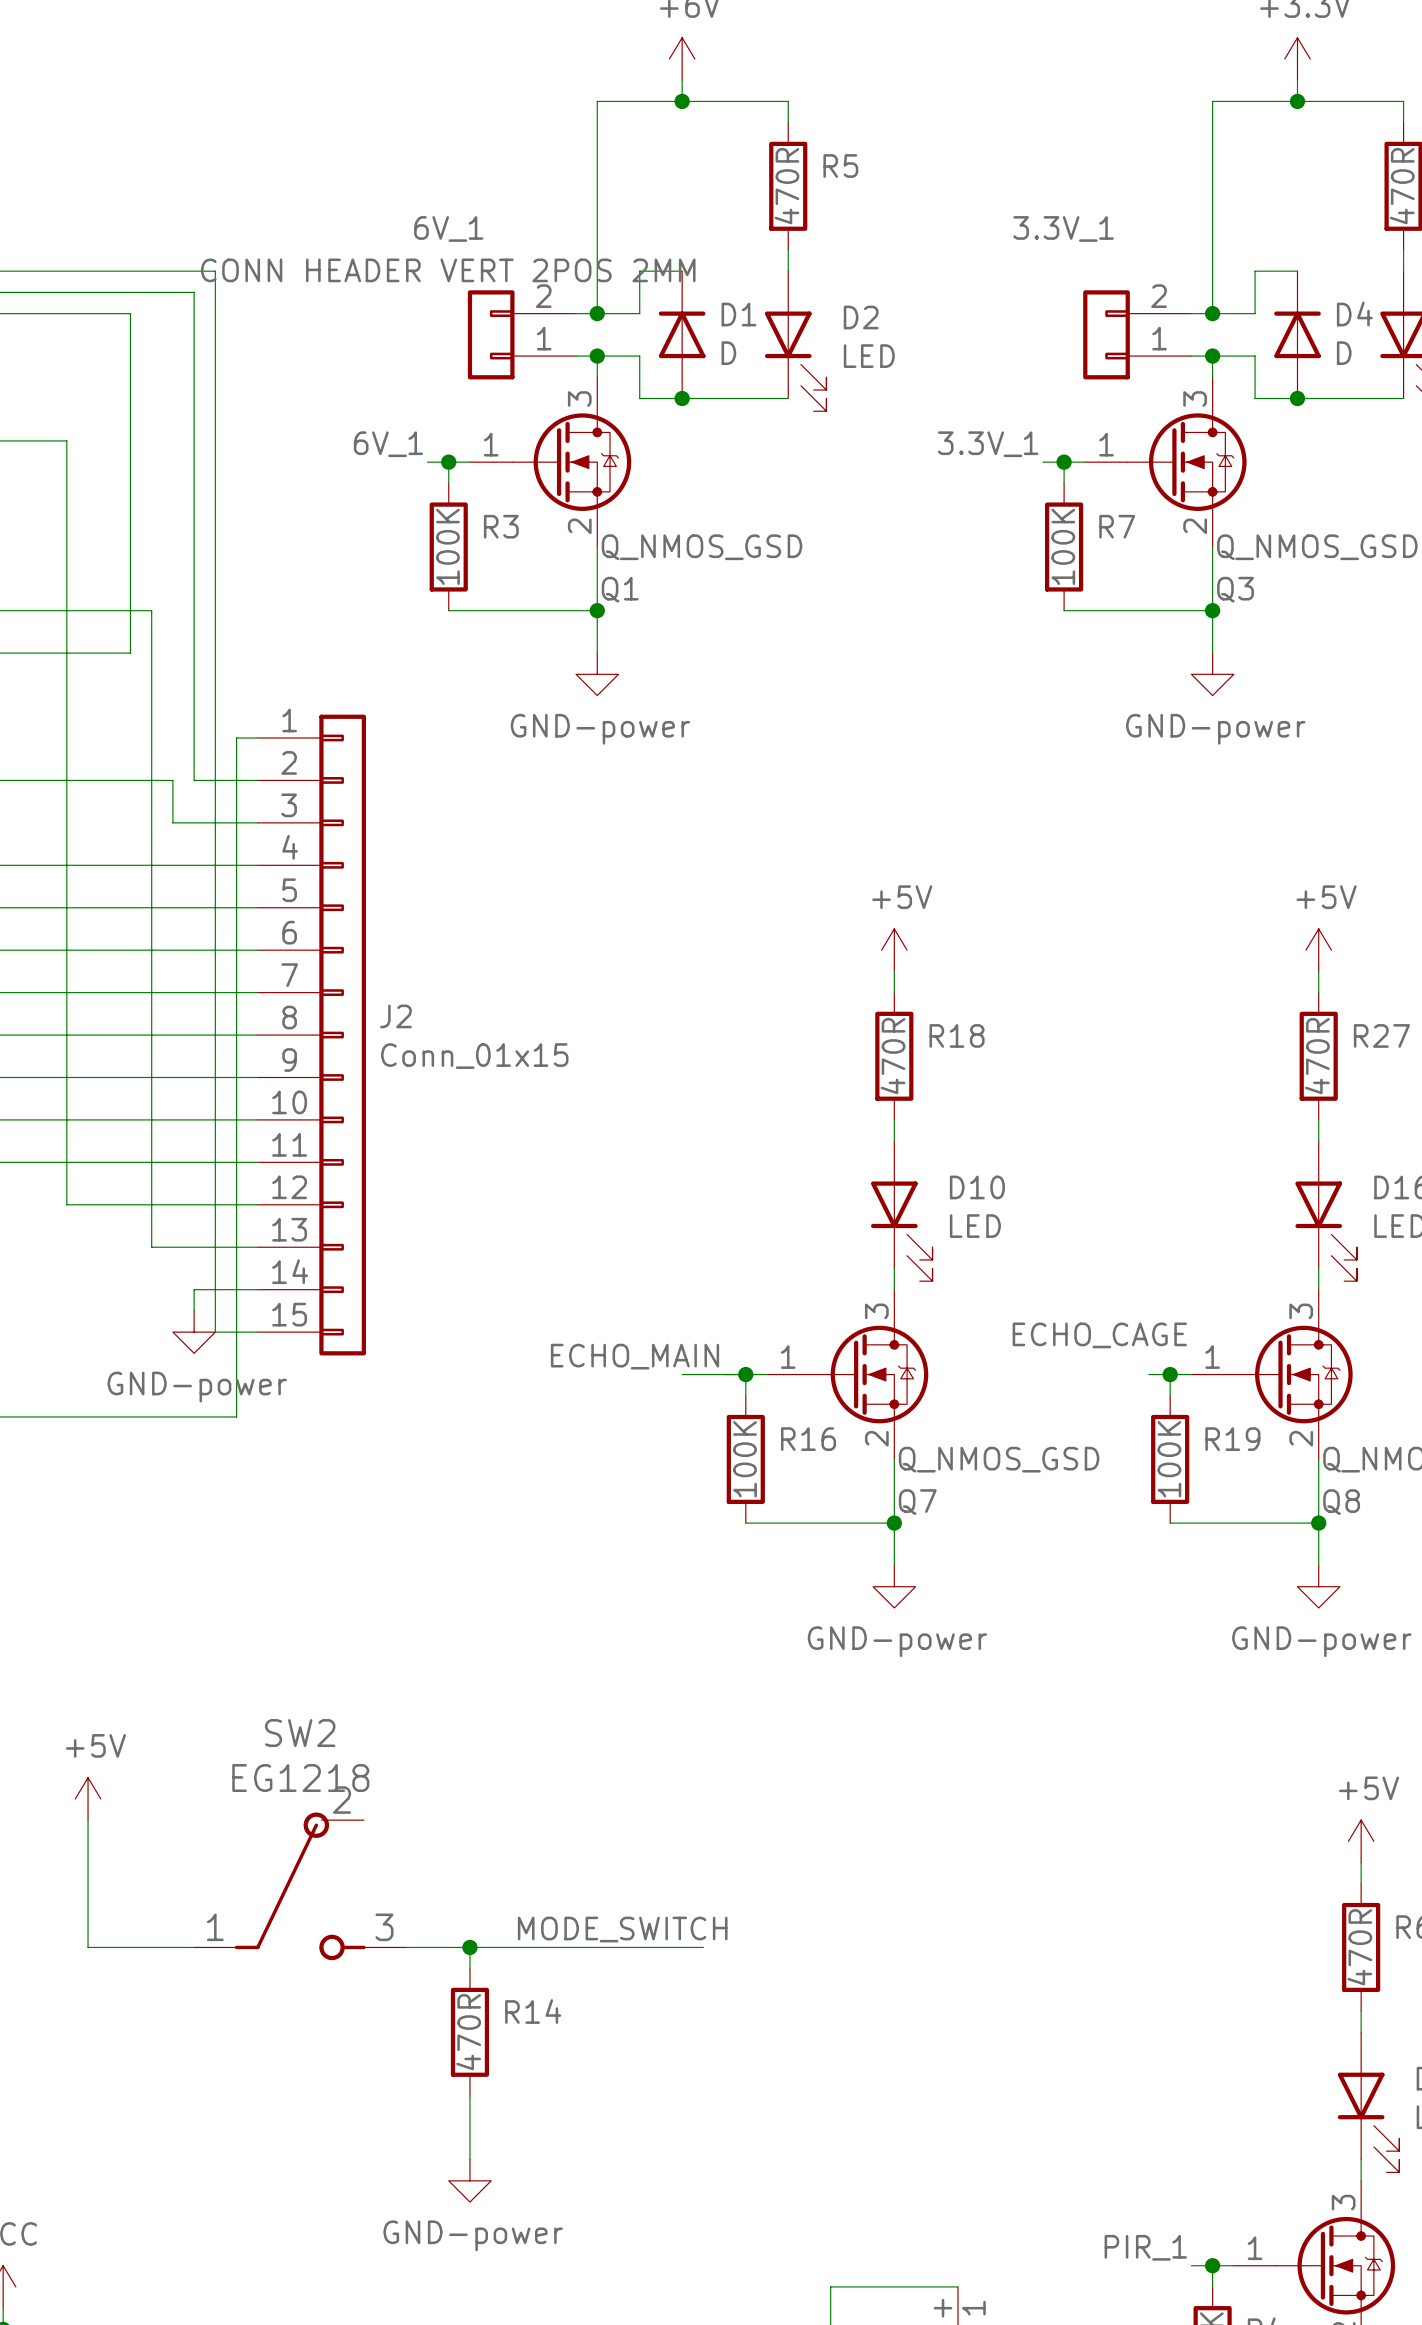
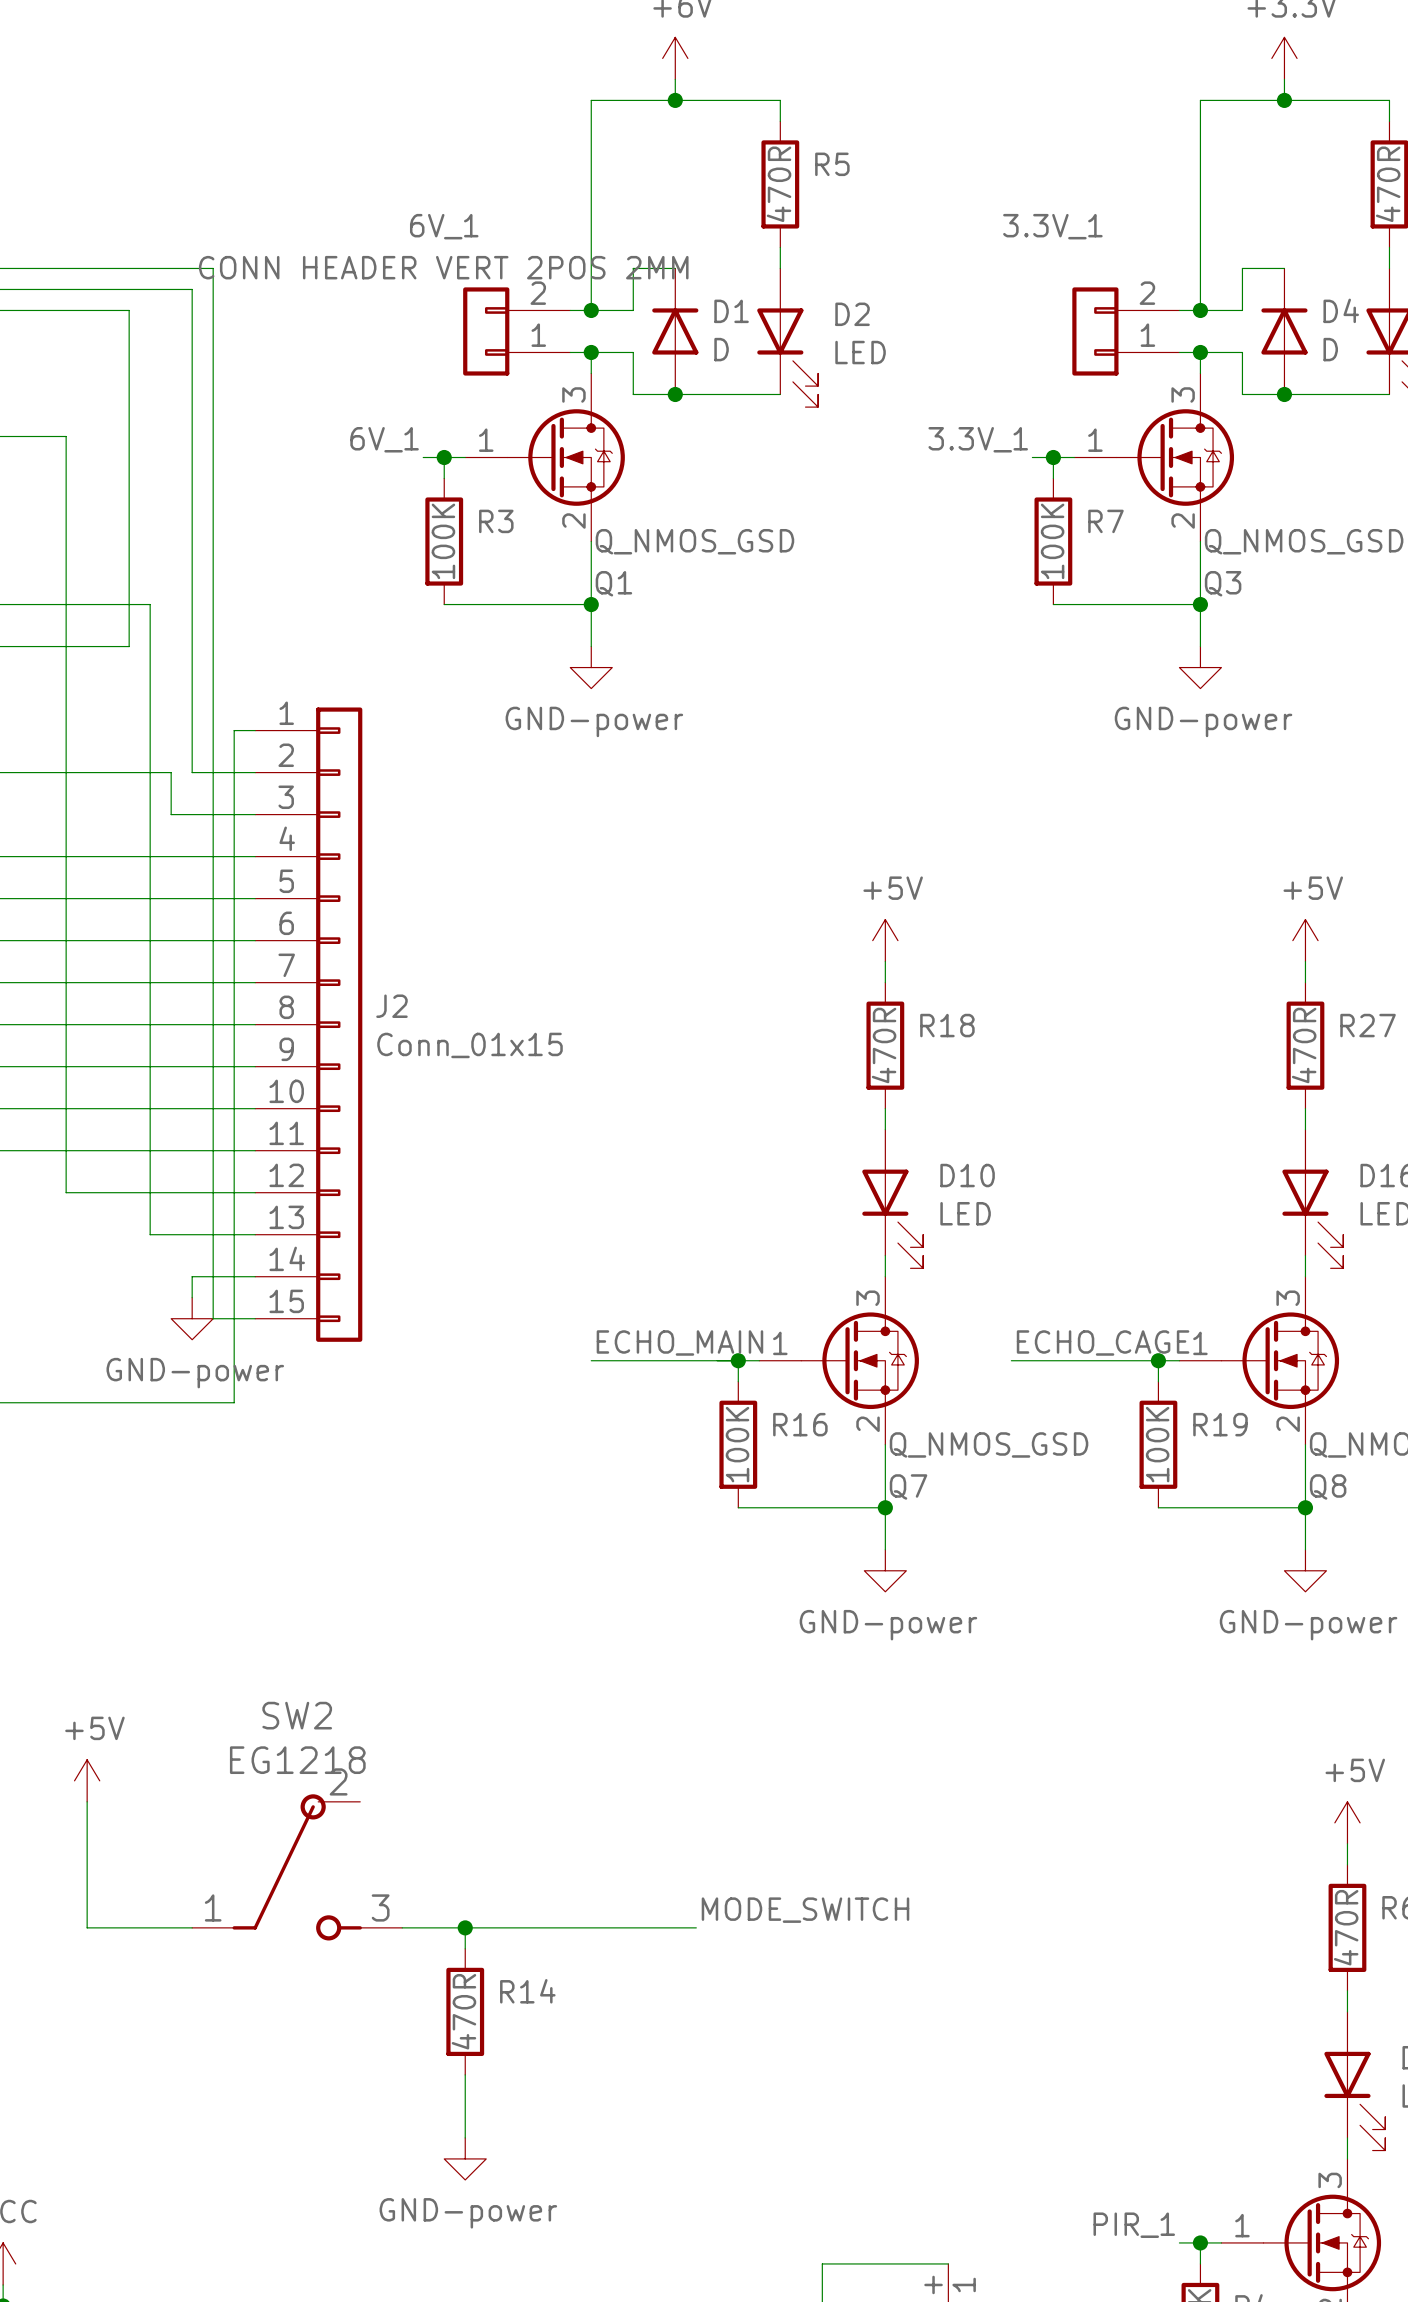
label position: ECHO_CAGE (1099, 1335) -> ECHO_CAGE (1103, 1342)
label position: ECHO_MAIN (635, 1356) -> ECHO_MAIN (679, 1342)
wire: none -> (591, 1360) (675, 1360)
wire: none -> (1011, 1360) (1137, 1360)
label position: MODE_SWITCH (622, 1929) -> MODE_SWITCH (805, 1910)

